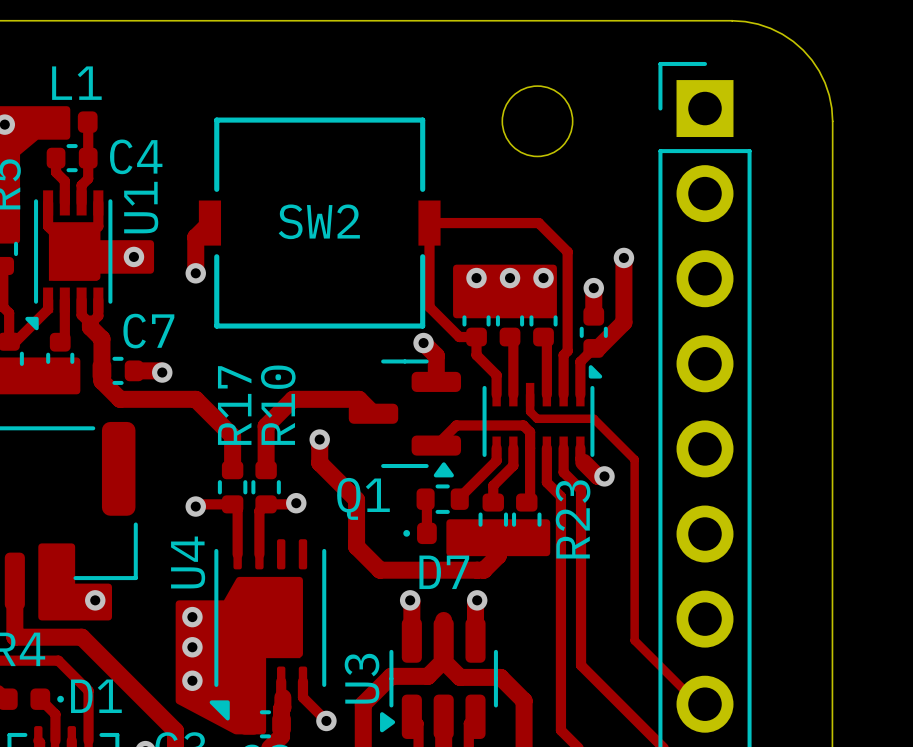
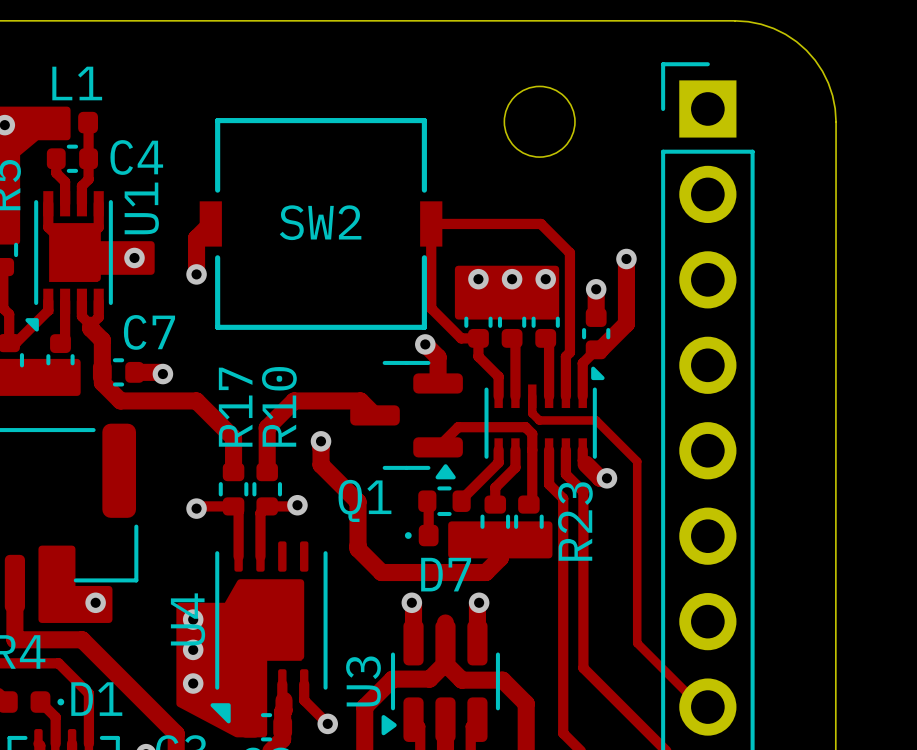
U4 name position: U4 (188, 562) -> U4 (188, 619)

